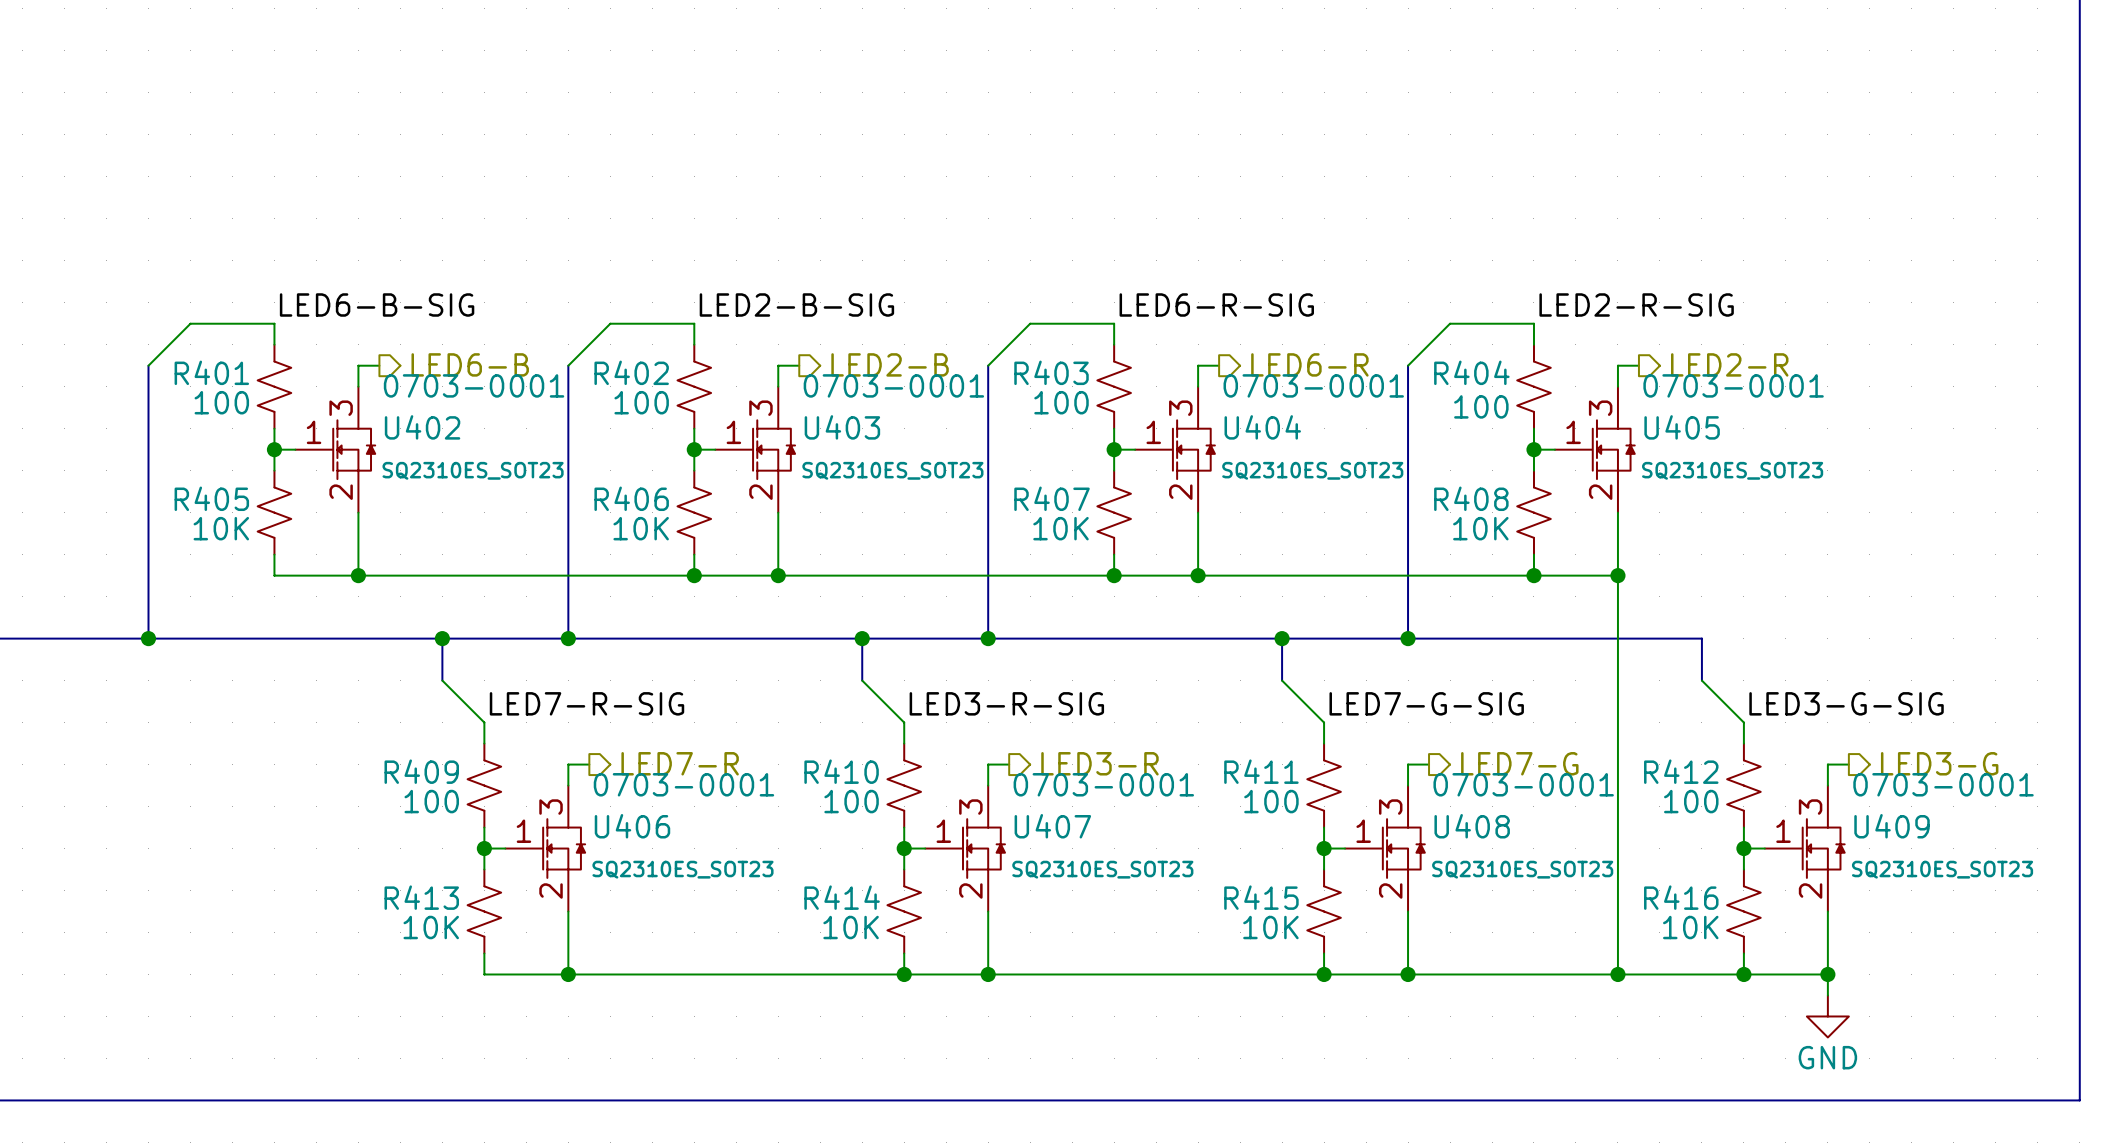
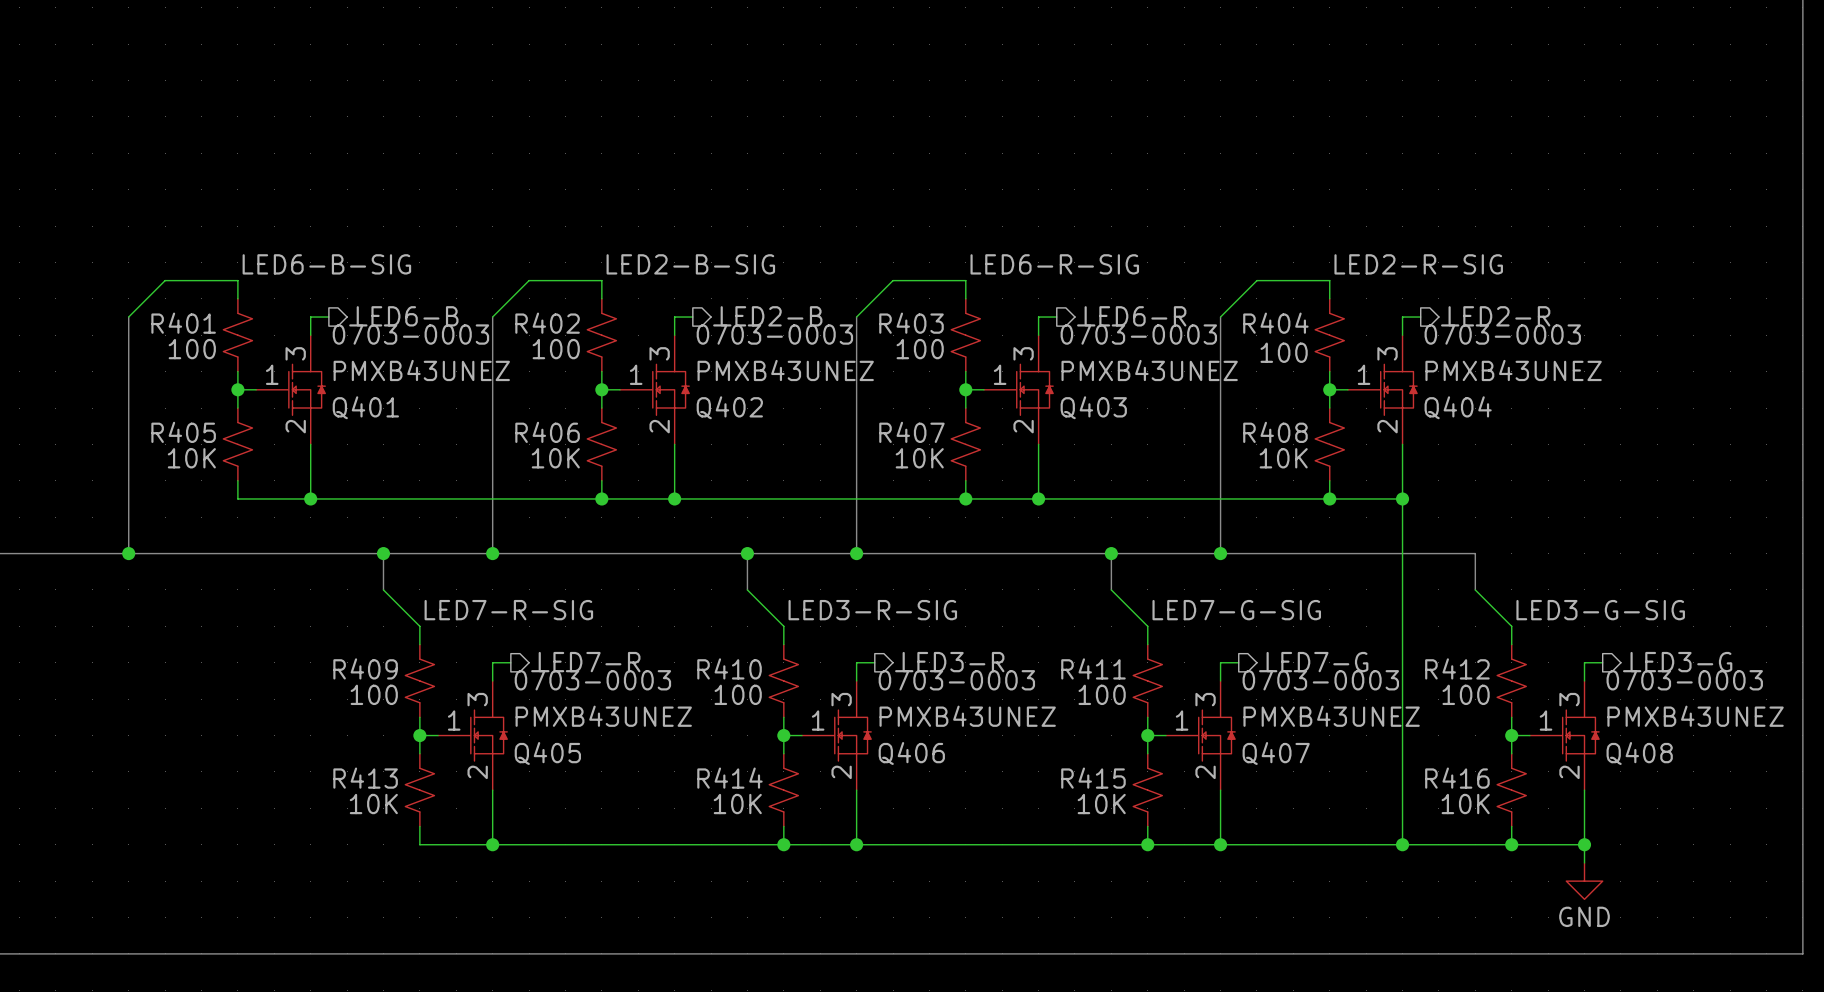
U402 text: 0703-0001 (474, 385) -> 0703-0003 (410, 334)
U403 text: 0703-0001 (893, 385) -> 0703-0003 (774, 334)
U404 text: 0703-0001 (1313, 385) -> 0703-0003 (1138, 334)
U405 text: 0703-0001 (1733, 385) -> 0703-0003 (1502, 334)
U402 name: U402 (422, 427) -> Q401 (365, 407)
U403 name: U403 (842, 427) -> Q402 (729, 407)
U404 name: U404 (1262, 427) -> Q403 (1093, 407)
U405 name: U405 (1682, 427) -> Q404 (1458, 407)
U402 value: SQ2310ES_SOT23 (473, 470) -> PMXB43UNEZ (421, 370)
U403 value: SQ2310ES_SOT23 (892, 470) -> PMXB43UNEZ (785, 370)
U404 value: SQ2310ES_SOT23 (1312, 470) -> PMXB43UNEZ (1149, 370)
U405 value: SQ2310ES_SOT23 (1732, 470) -> PMXB43UNEZ (1513, 370)
U406 text: 0703-0001 (683, 784) -> 0703-0003 (592, 680)
U407 text: 0703-0001 (1103, 784) -> 0703-0003 (956, 680)
U408 text: 0703-0001 (1523, 784) -> 0703-0003 (1320, 680)
U409 text: 0703-0001 (1943, 784) -> 0703-0003 (1684, 680)
U406 name: U406 (632, 826) -> Q405 (547, 753)
U407 name: U407 (1052, 826) -> Q406 (911, 753)
U408 name: U408 (1472, 826) -> Q407 (1276, 753)
U409 name: U409 (1892, 826) -> Q408 (1639, 753)
U406 value: SQ2310ES_SOT23 (682, 869) -> PMXB43UNEZ (603, 716)
U407 value: SQ2310ES_SOT23 (1102, 869) -> PMXB43UNEZ (967, 716)
U408 value: SQ2310ES_SOT23 (1522, 869) -> PMXB43UNEZ (1331, 716)
U409 value: SQ2310ES_SOT23 (1942, 869) -> PMXB43UNEZ (1695, 716)

